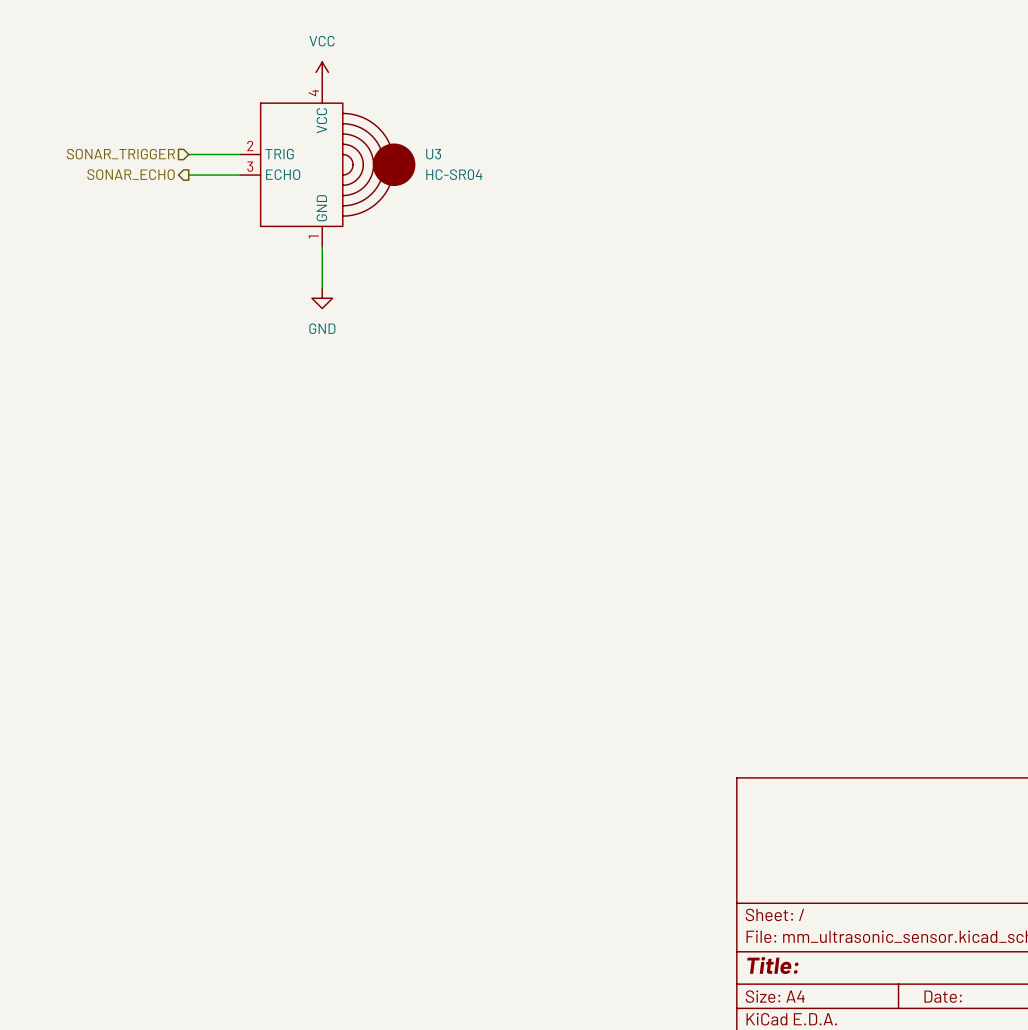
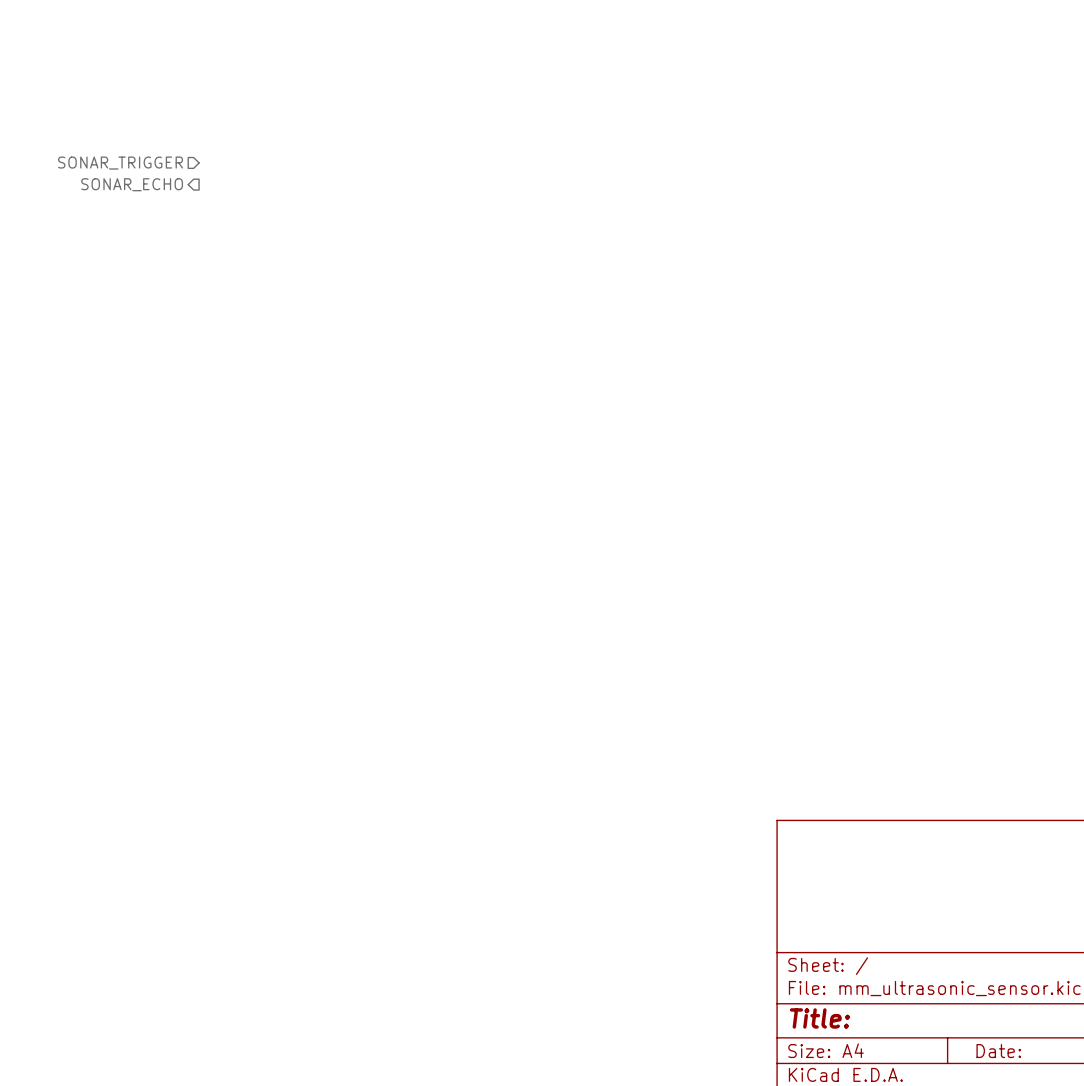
power symbol: VCC (322, 72) -> none
wire: (188, 154) (240, 154) -> none
U3: HC-SR04 (327, 164) -> none
wire: (188, 175) (240, 175) -> none
wire: (322, 246) (322, 288) -> none
power symbol: GND (322, 298) -> none

